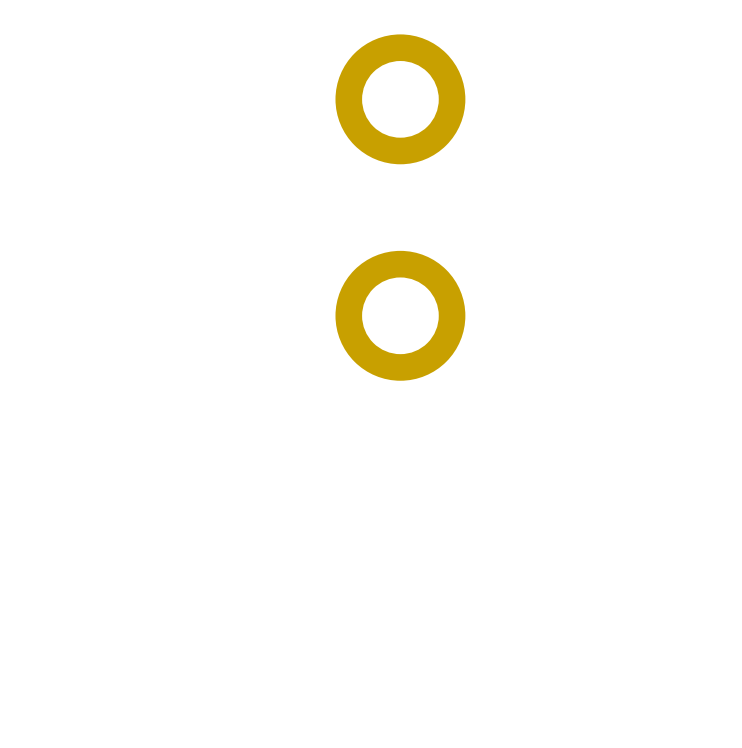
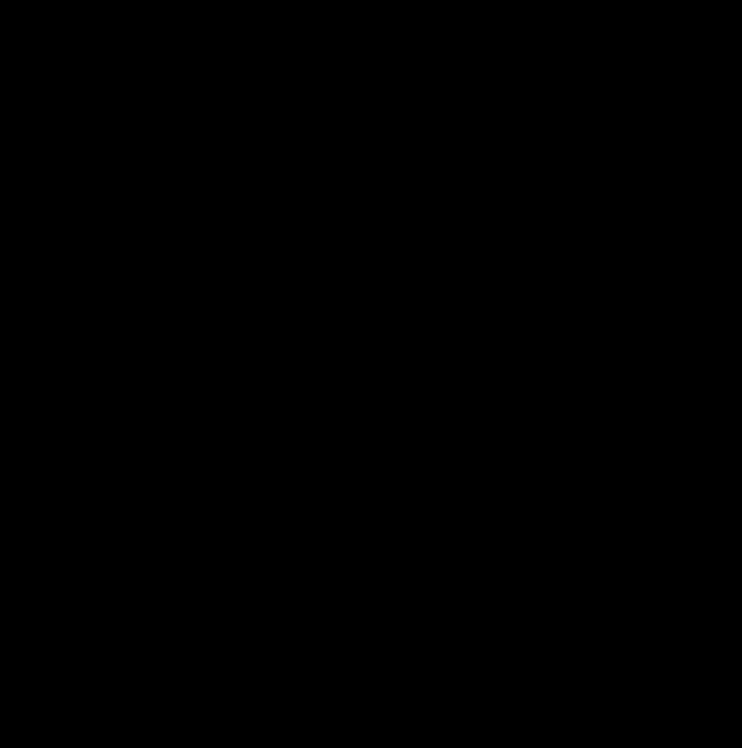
part: (400, 207) -> none

